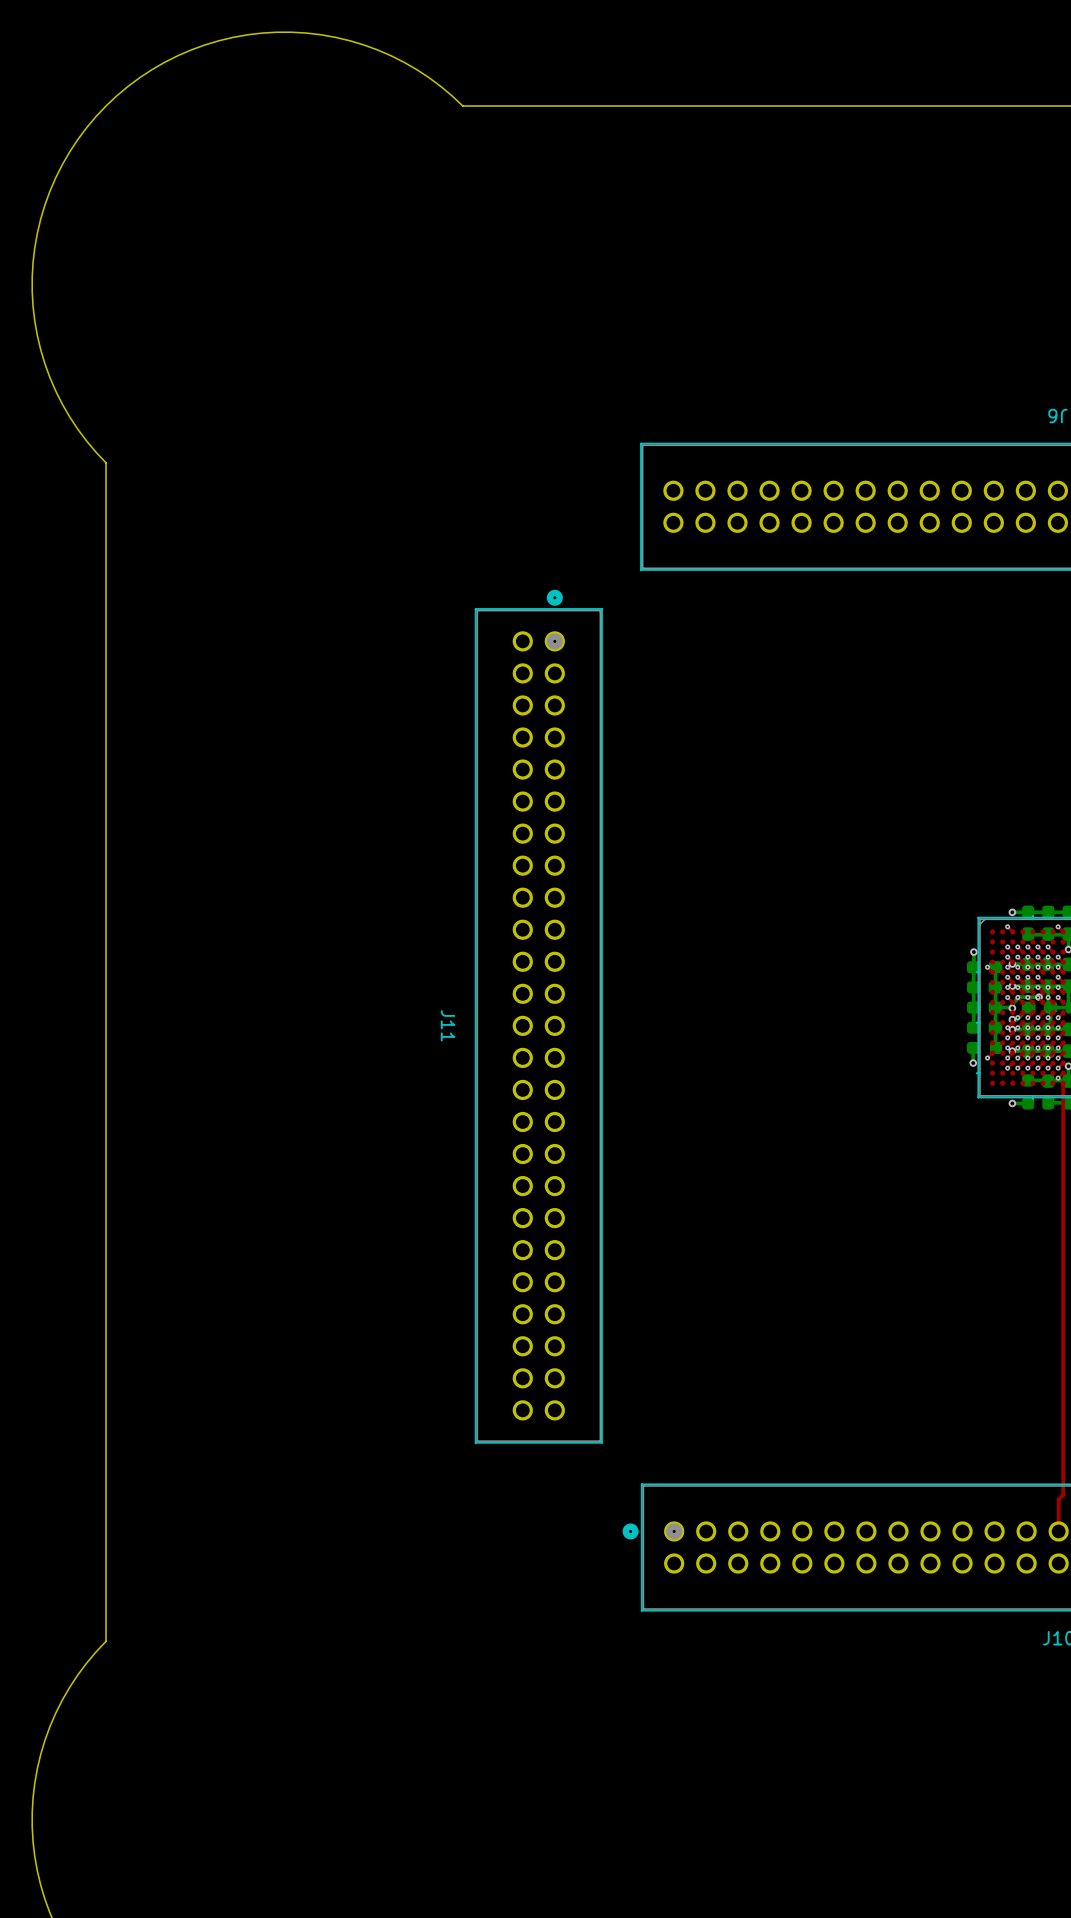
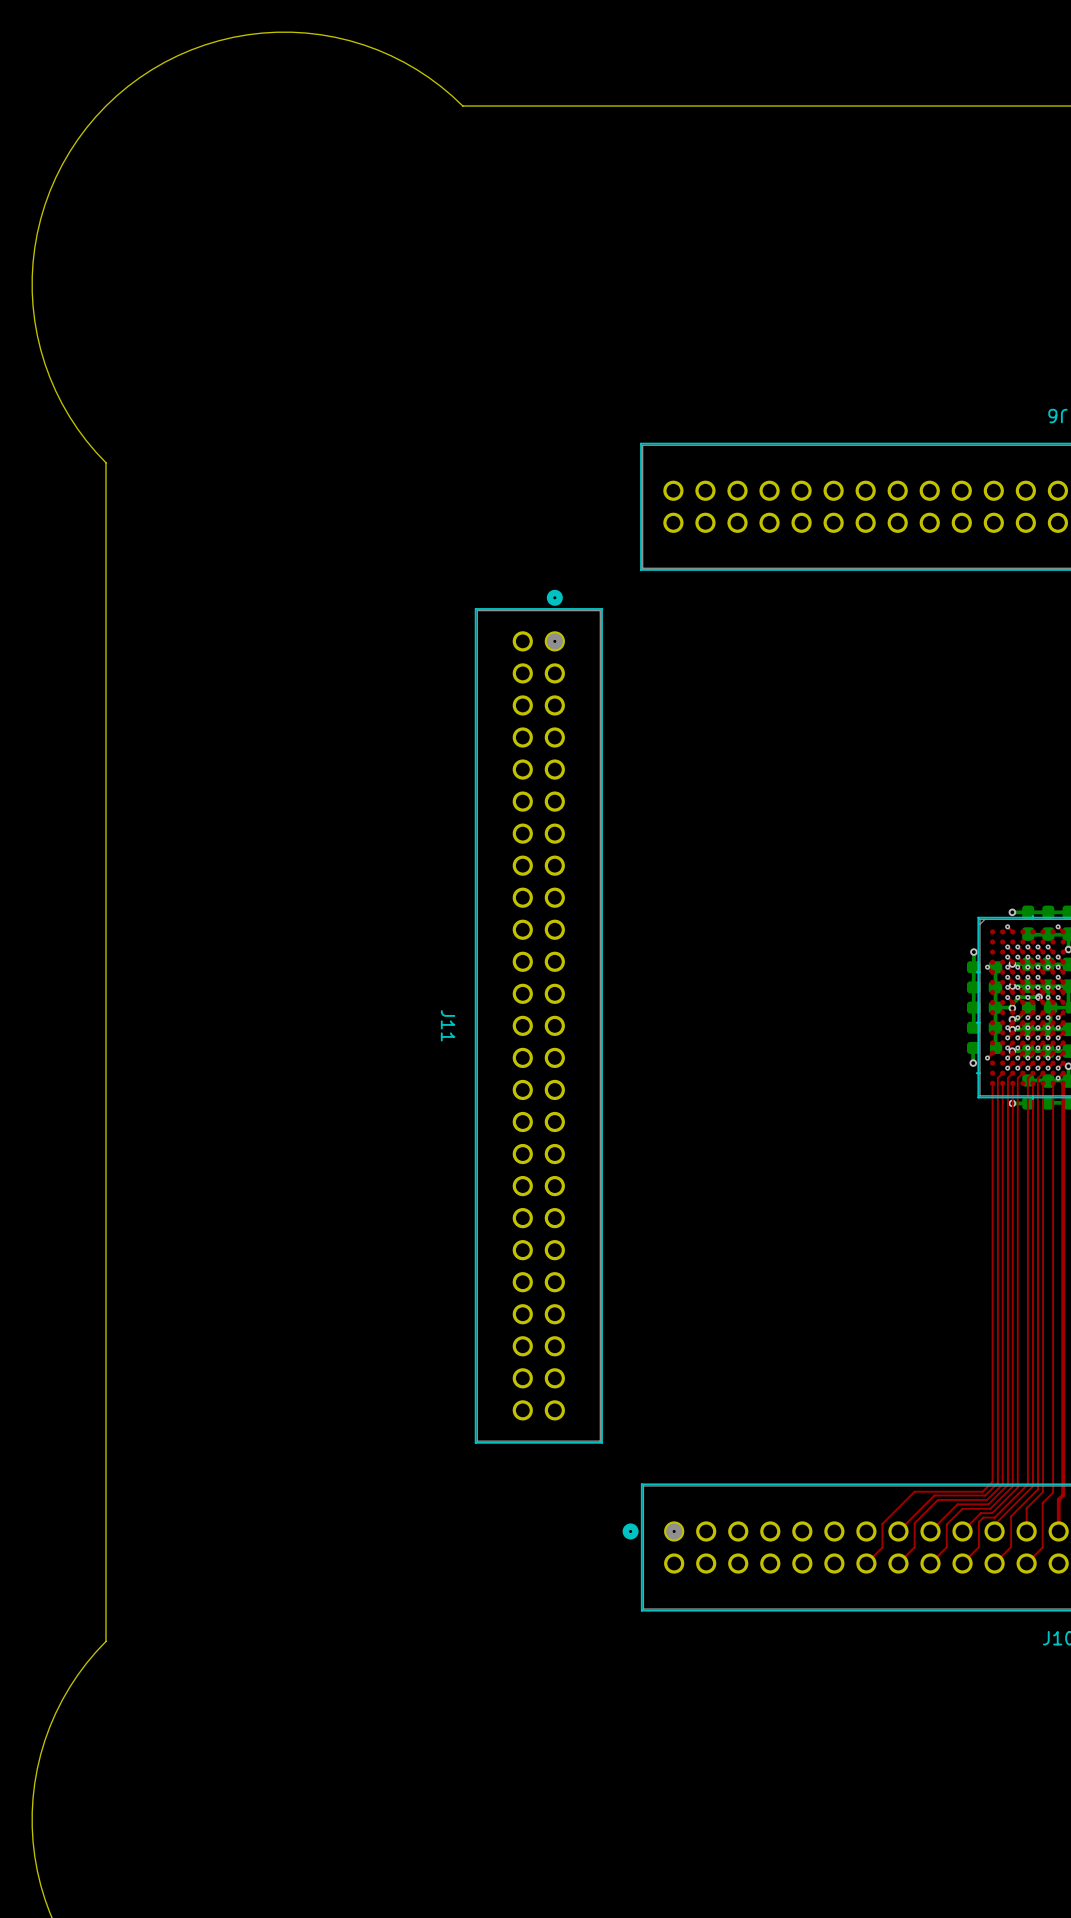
top track: none -> (1002, 1073) (997, 1077) (997, 1482) (985, 1495) (934, 1495) (898, 1531)
top track: none -> (1012, 1073) (1007, 1077) (1007, 1484) (988, 1504) (957, 1504) (930, 1531)
top track: none -> (1022, 1073) (1017, 1078) (1017, 1487) (992, 1513) (980, 1513) (962, 1531)
top track: none -> (1032, 1073) (1027, 1078) (1027, 1484) (994, 1517) (983, 1517) (978, 1522) (978, 1547) (962, 1563)
top track: none -> (1043, 1073) (1037, 1078) (1037, 1489) (1011, 1516) (1011, 1546) (994, 1563)
top track: none -> (992, 1083) (992, 1481) (982, 1491) (914, 1491) (882, 1523) (882, 1547) (866, 1563)
top track: none -> (1002, 1083) (1002, 1484) (987, 1499) (937, 1499) (914, 1523) (914, 1547) (898, 1563)
top track: none -> (1012, 1083) (1012, 1486) (990, 1508) (962, 1508) (946, 1524) (946, 1547) (930, 1563)
top track: none -> (1032, 1083) (1032, 1486) (994, 1524) (994, 1531)
top track: none -> (1043, 1083) (1043, 1491) (1026, 1508) (1026, 1531)
top track: none -> (1053, 1083) (1053, 1492) (1042, 1503) (1042, 1547) (1026, 1563)

